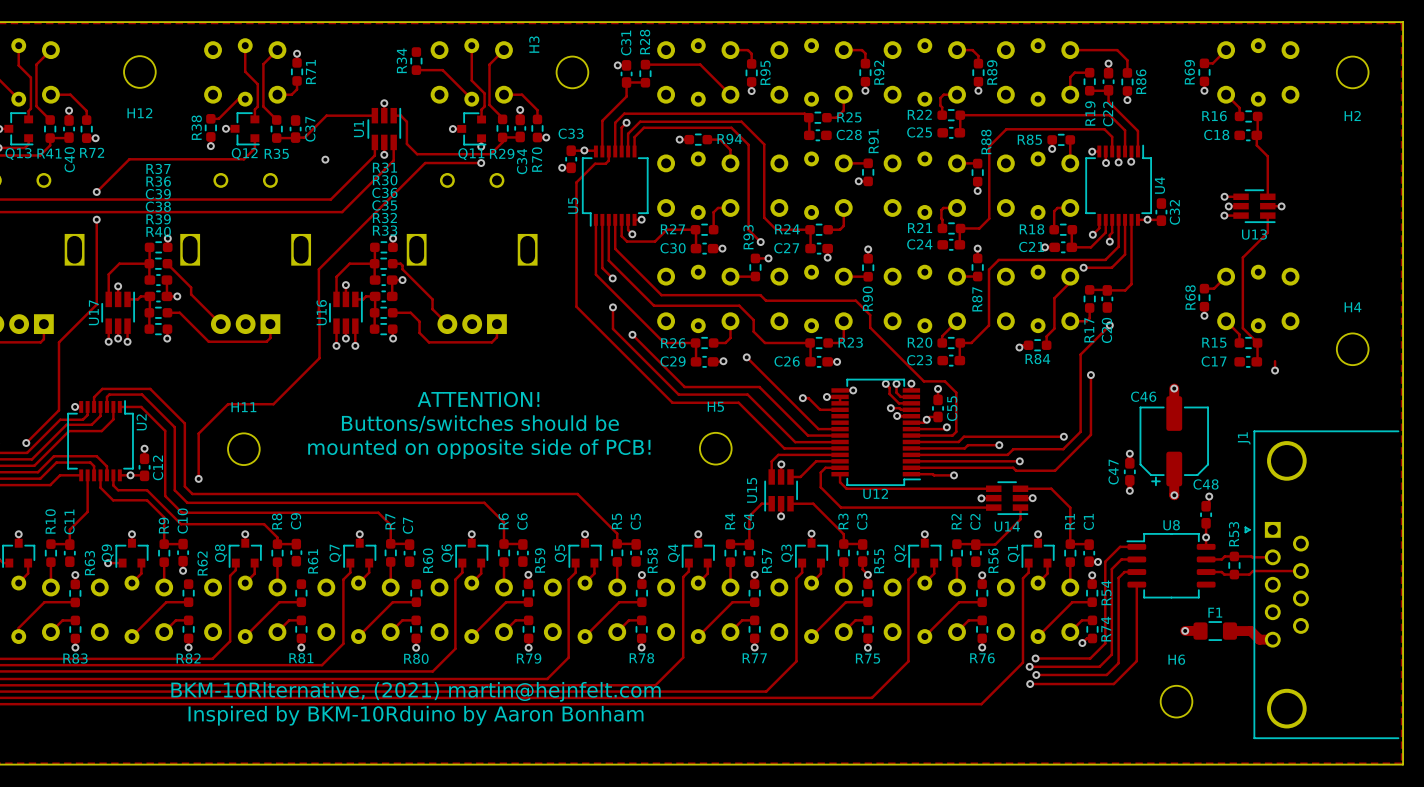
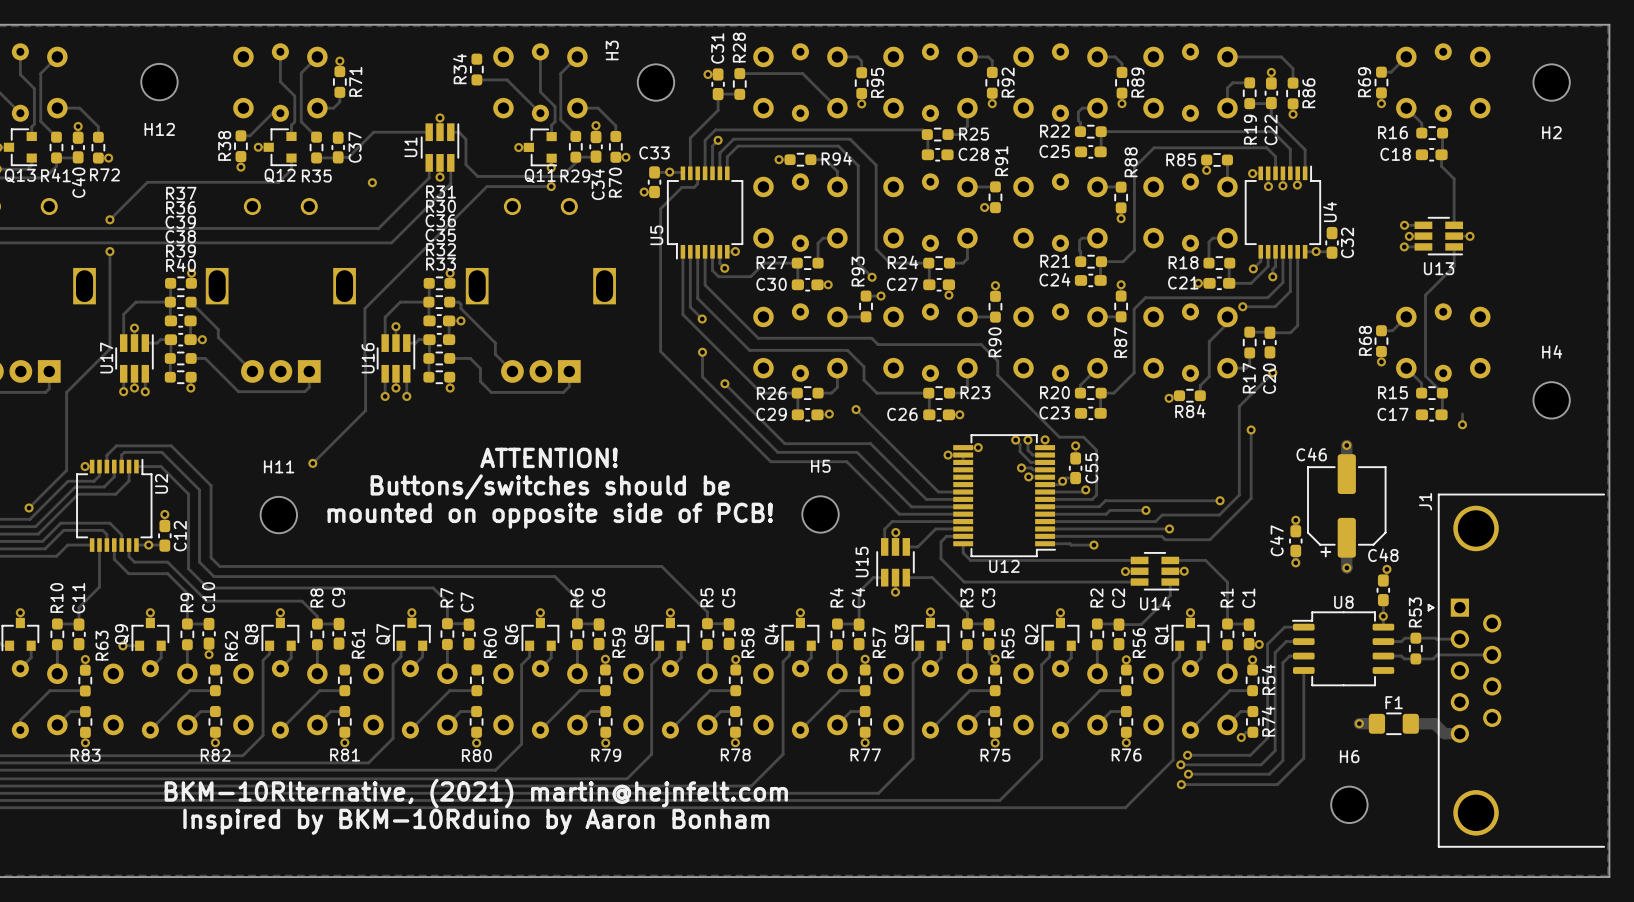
track: (802, 398) (808, 398) (820, 409) (840, 409) -> none
via: (802, 398) -> none
track: (273, 404) (228, 404) (198, 433) (198, 478) -> none
via: none -> (312, 463)
via: (198, 478) -> none

